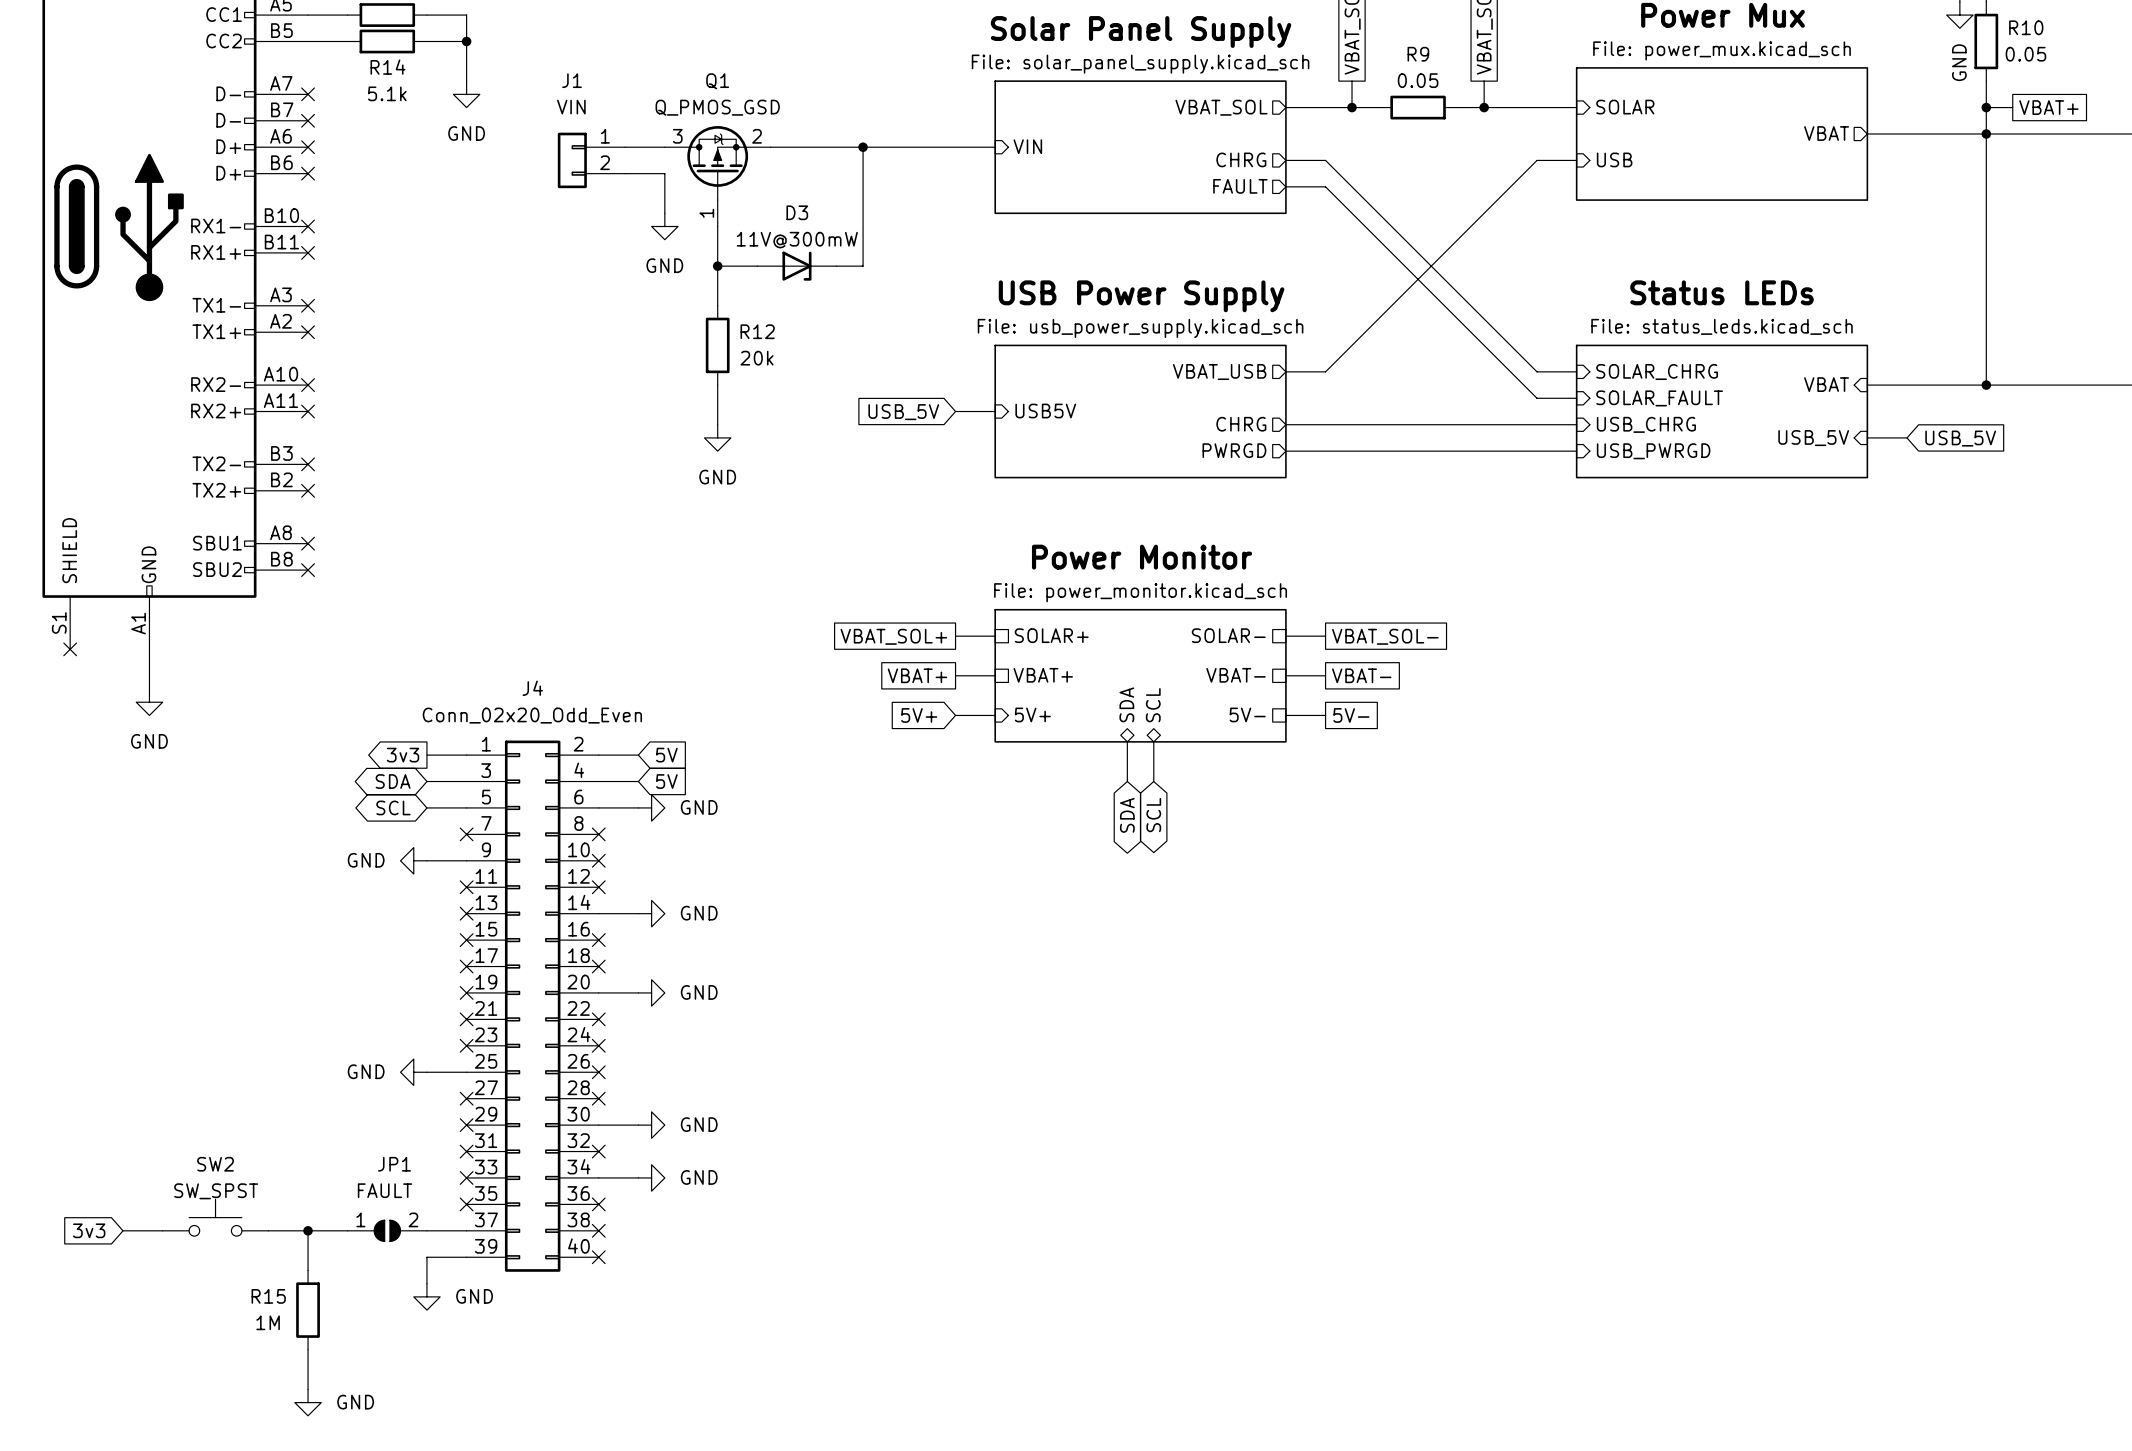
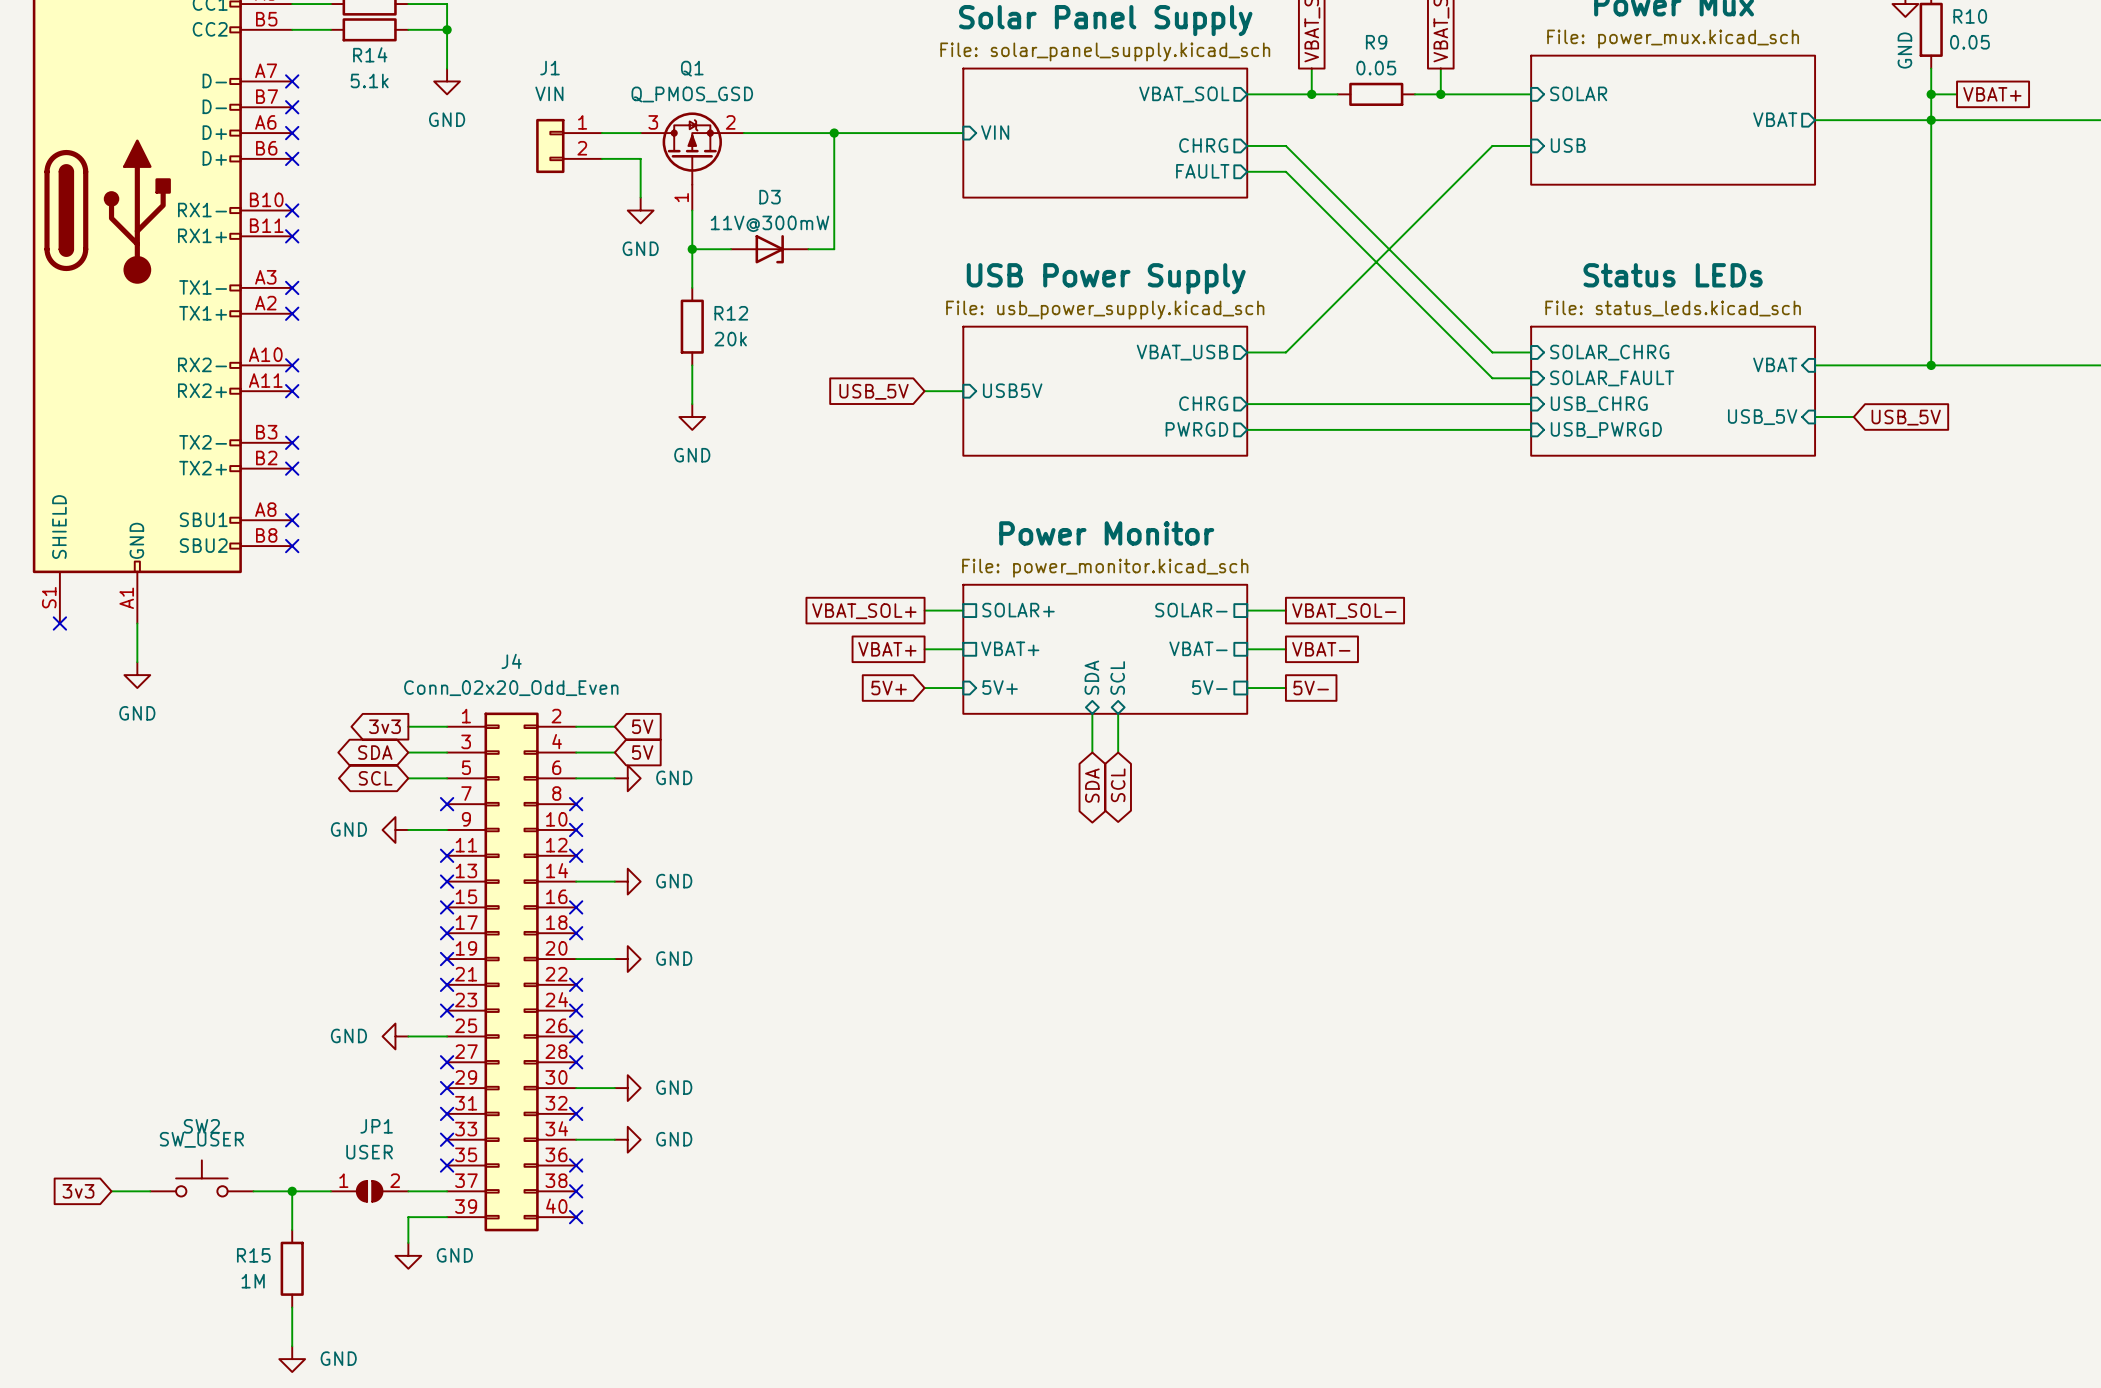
JP1 value: FAULT (385, 1190) -> USER (369, 1152)
SW2 value: SW_SPST (216, 1191) -> SW_USER (201, 1139)

